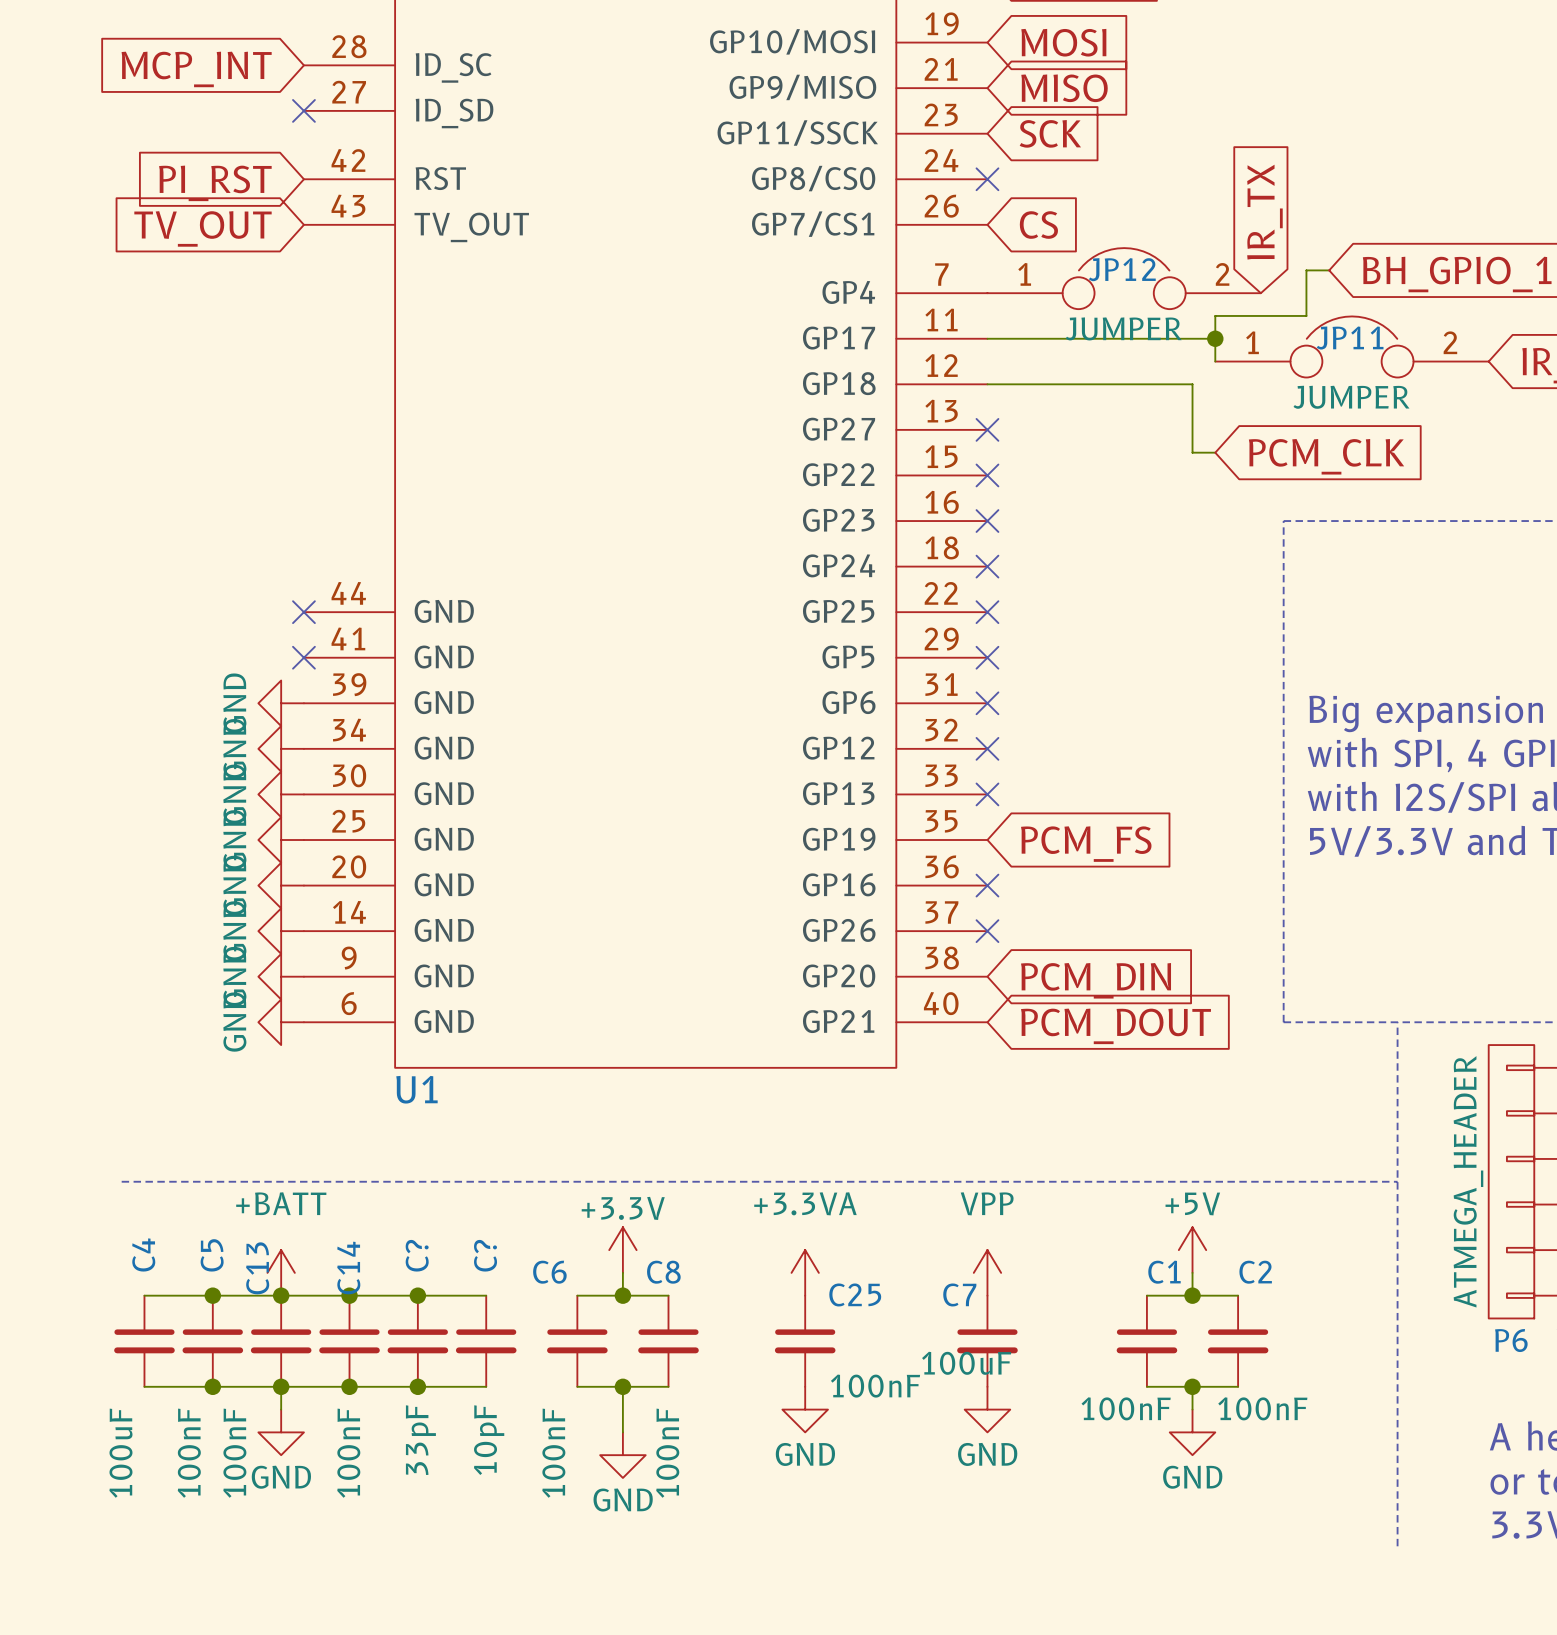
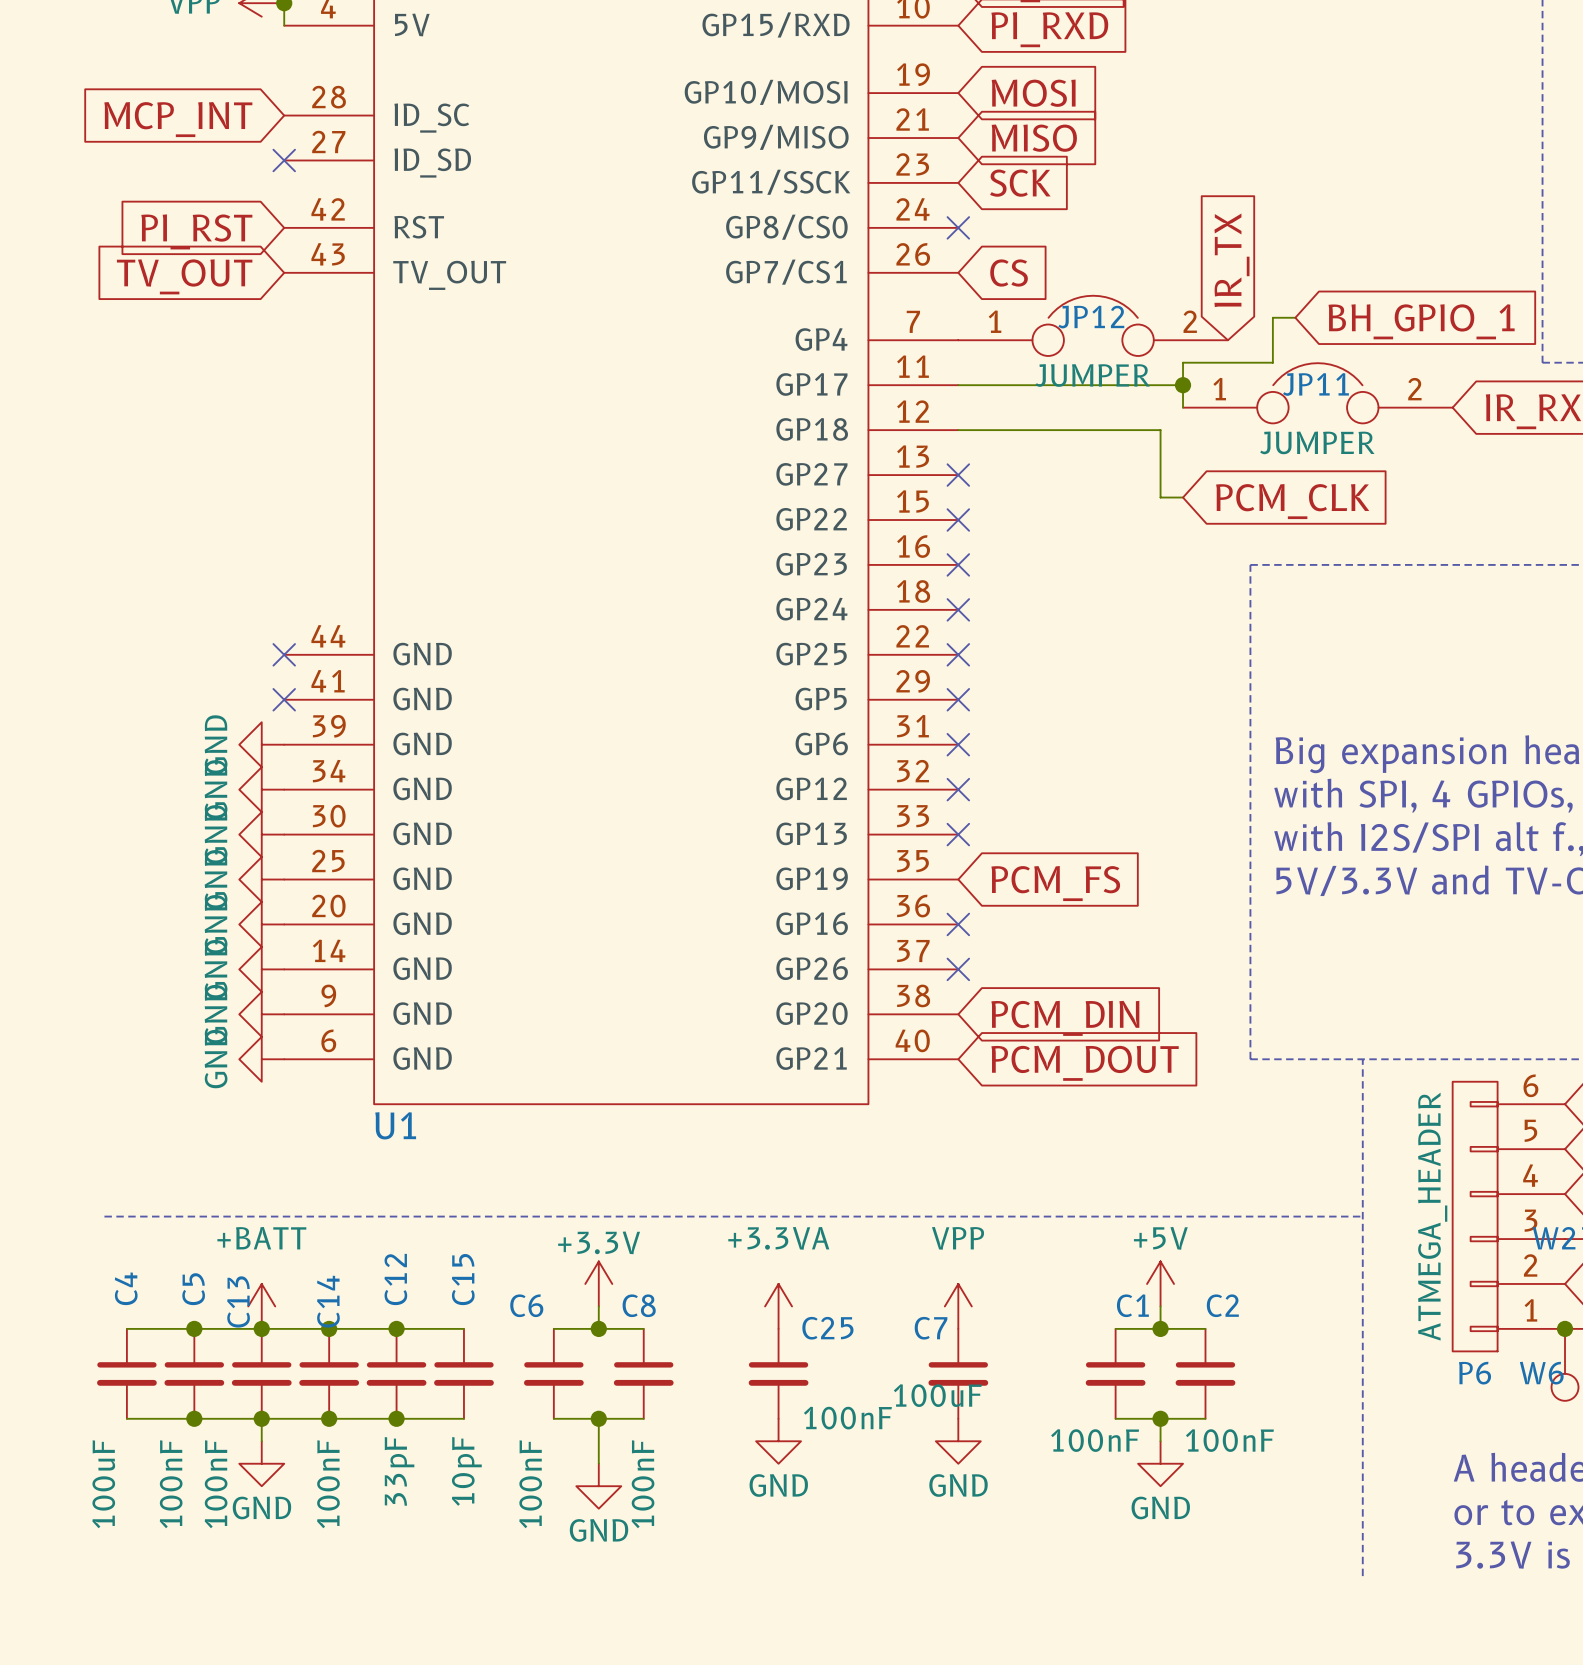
C? name: C? (417, 1255) -> C12 (395, 1279)
C? name: C? (485, 1255) -> C15 (463, 1279)

